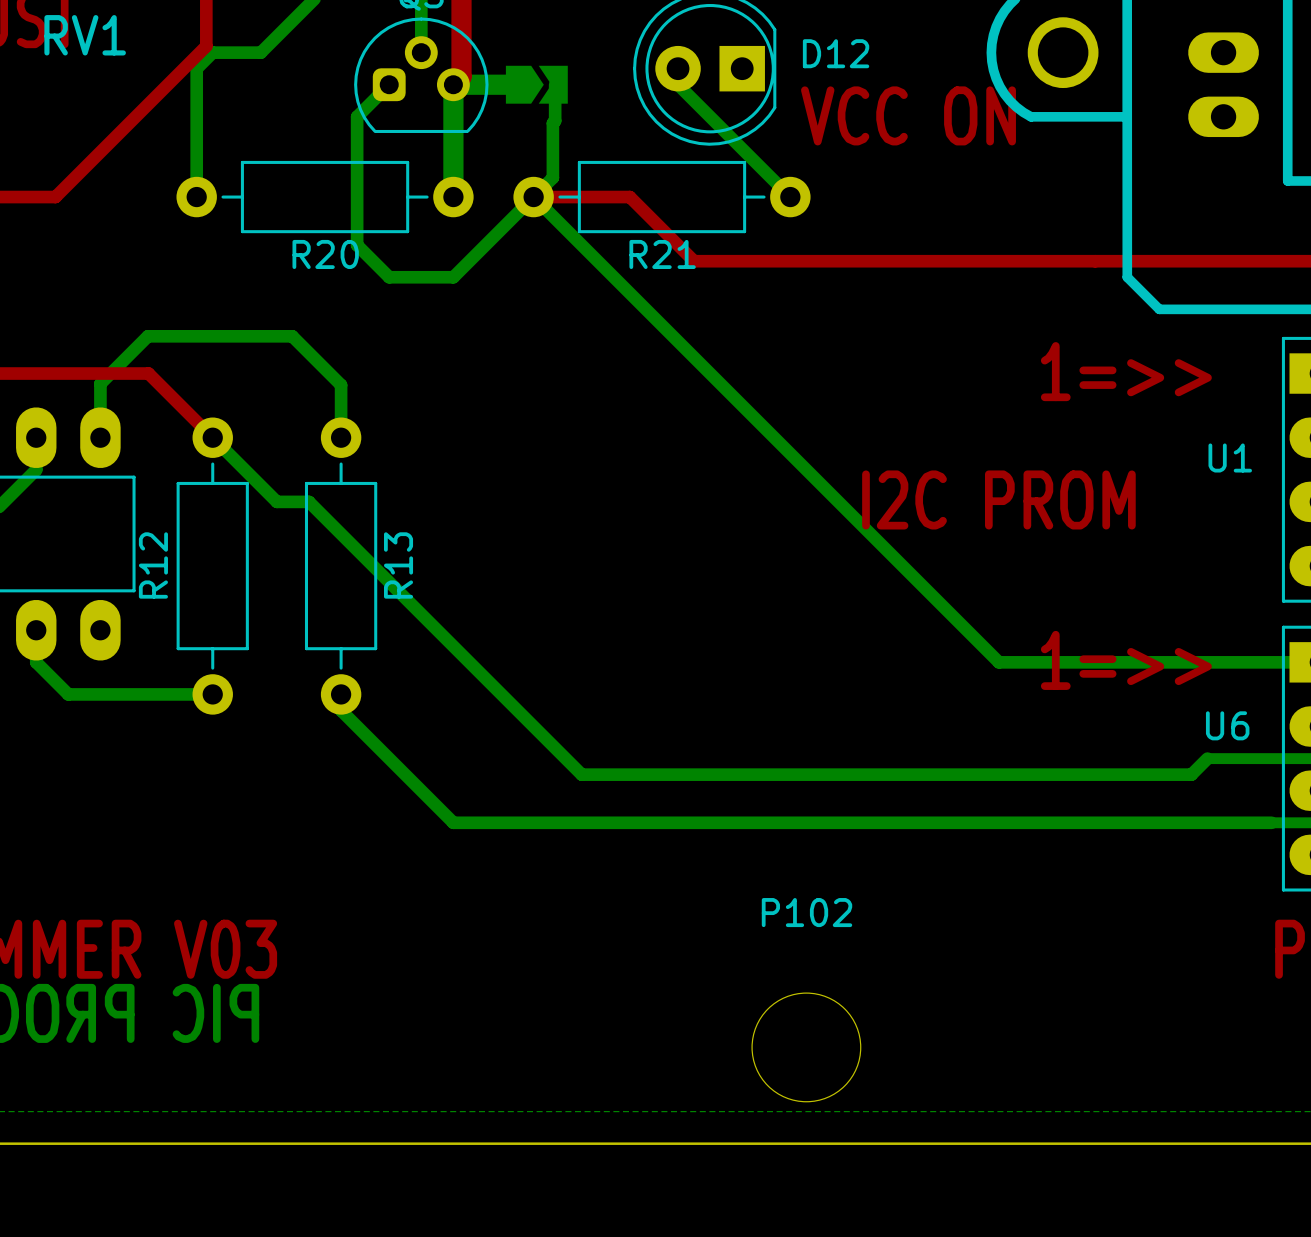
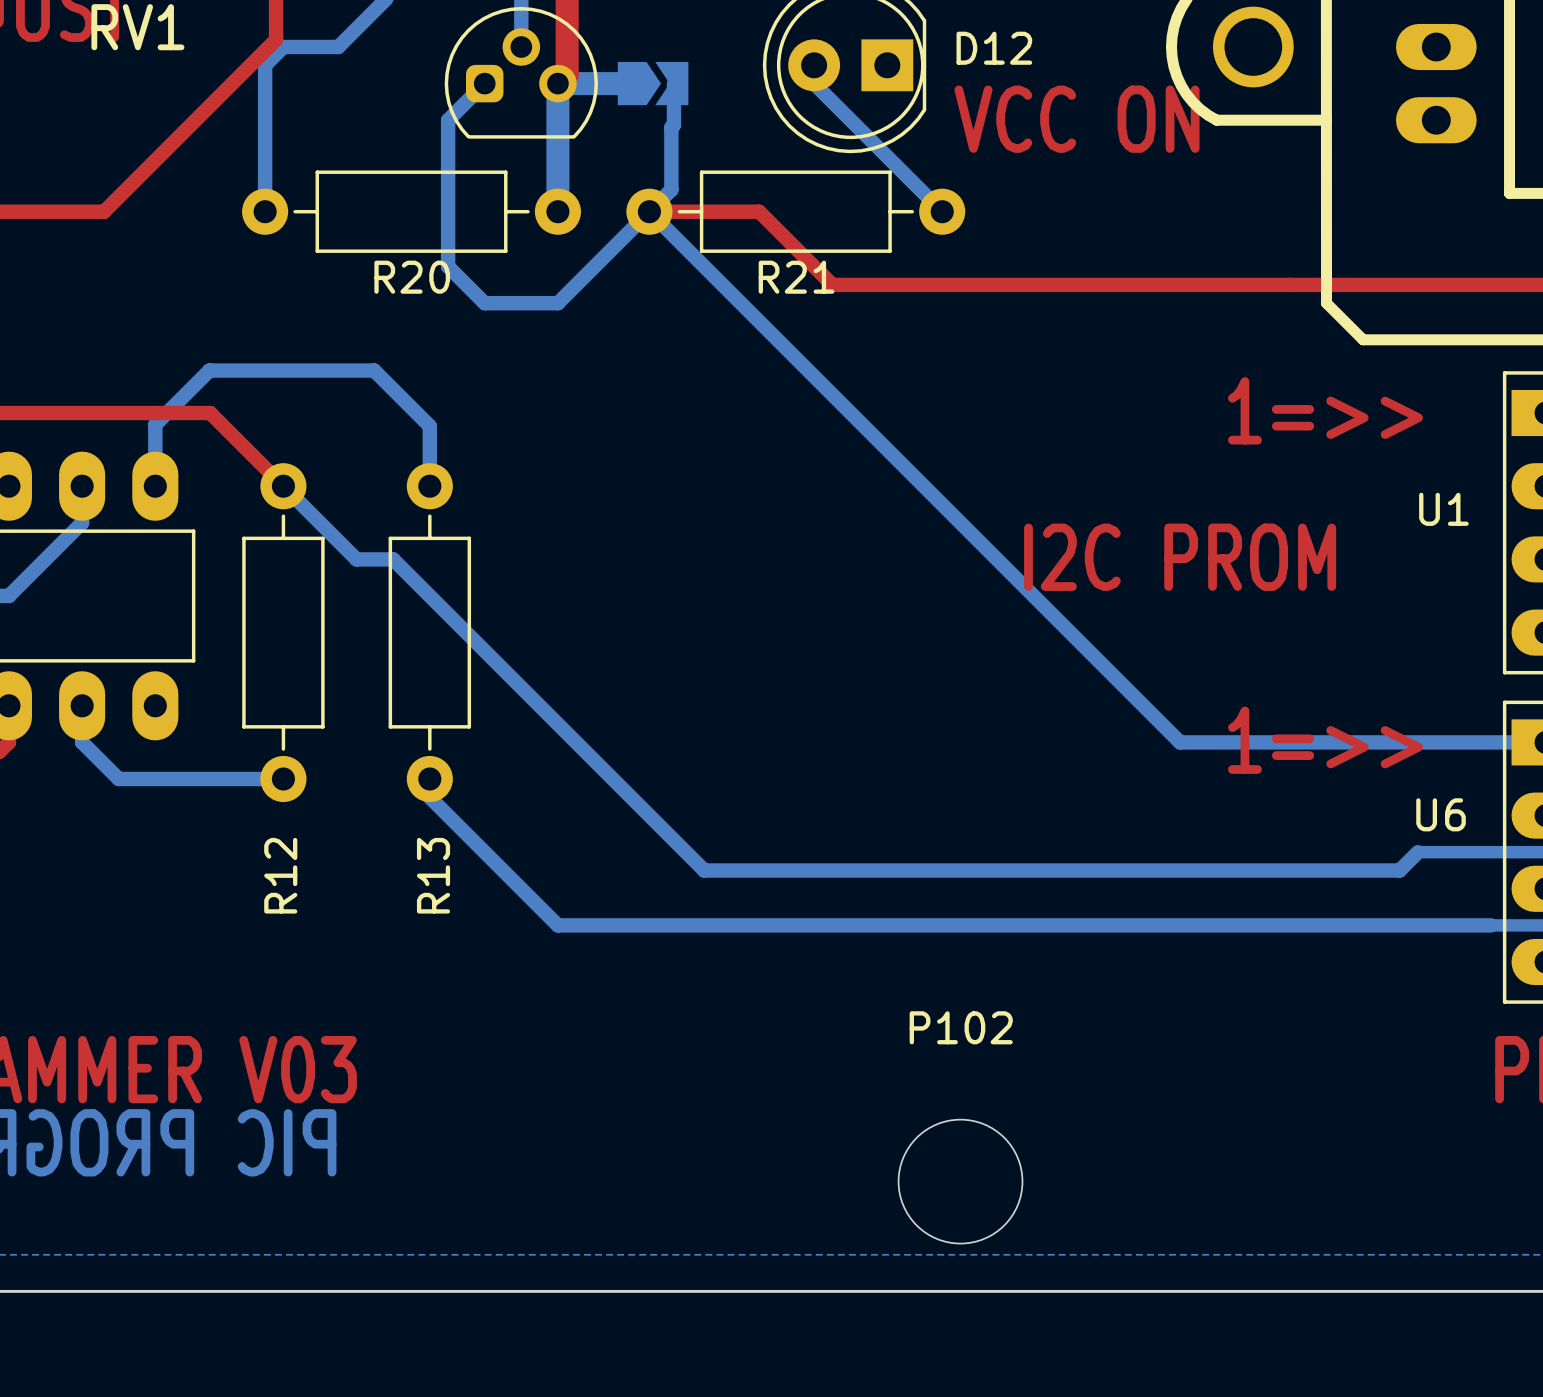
R12 name position: R12 (153, 565) -> R12 (280, 875)
R13 name position: R13 (398, 565) -> R13 (433, 875)

